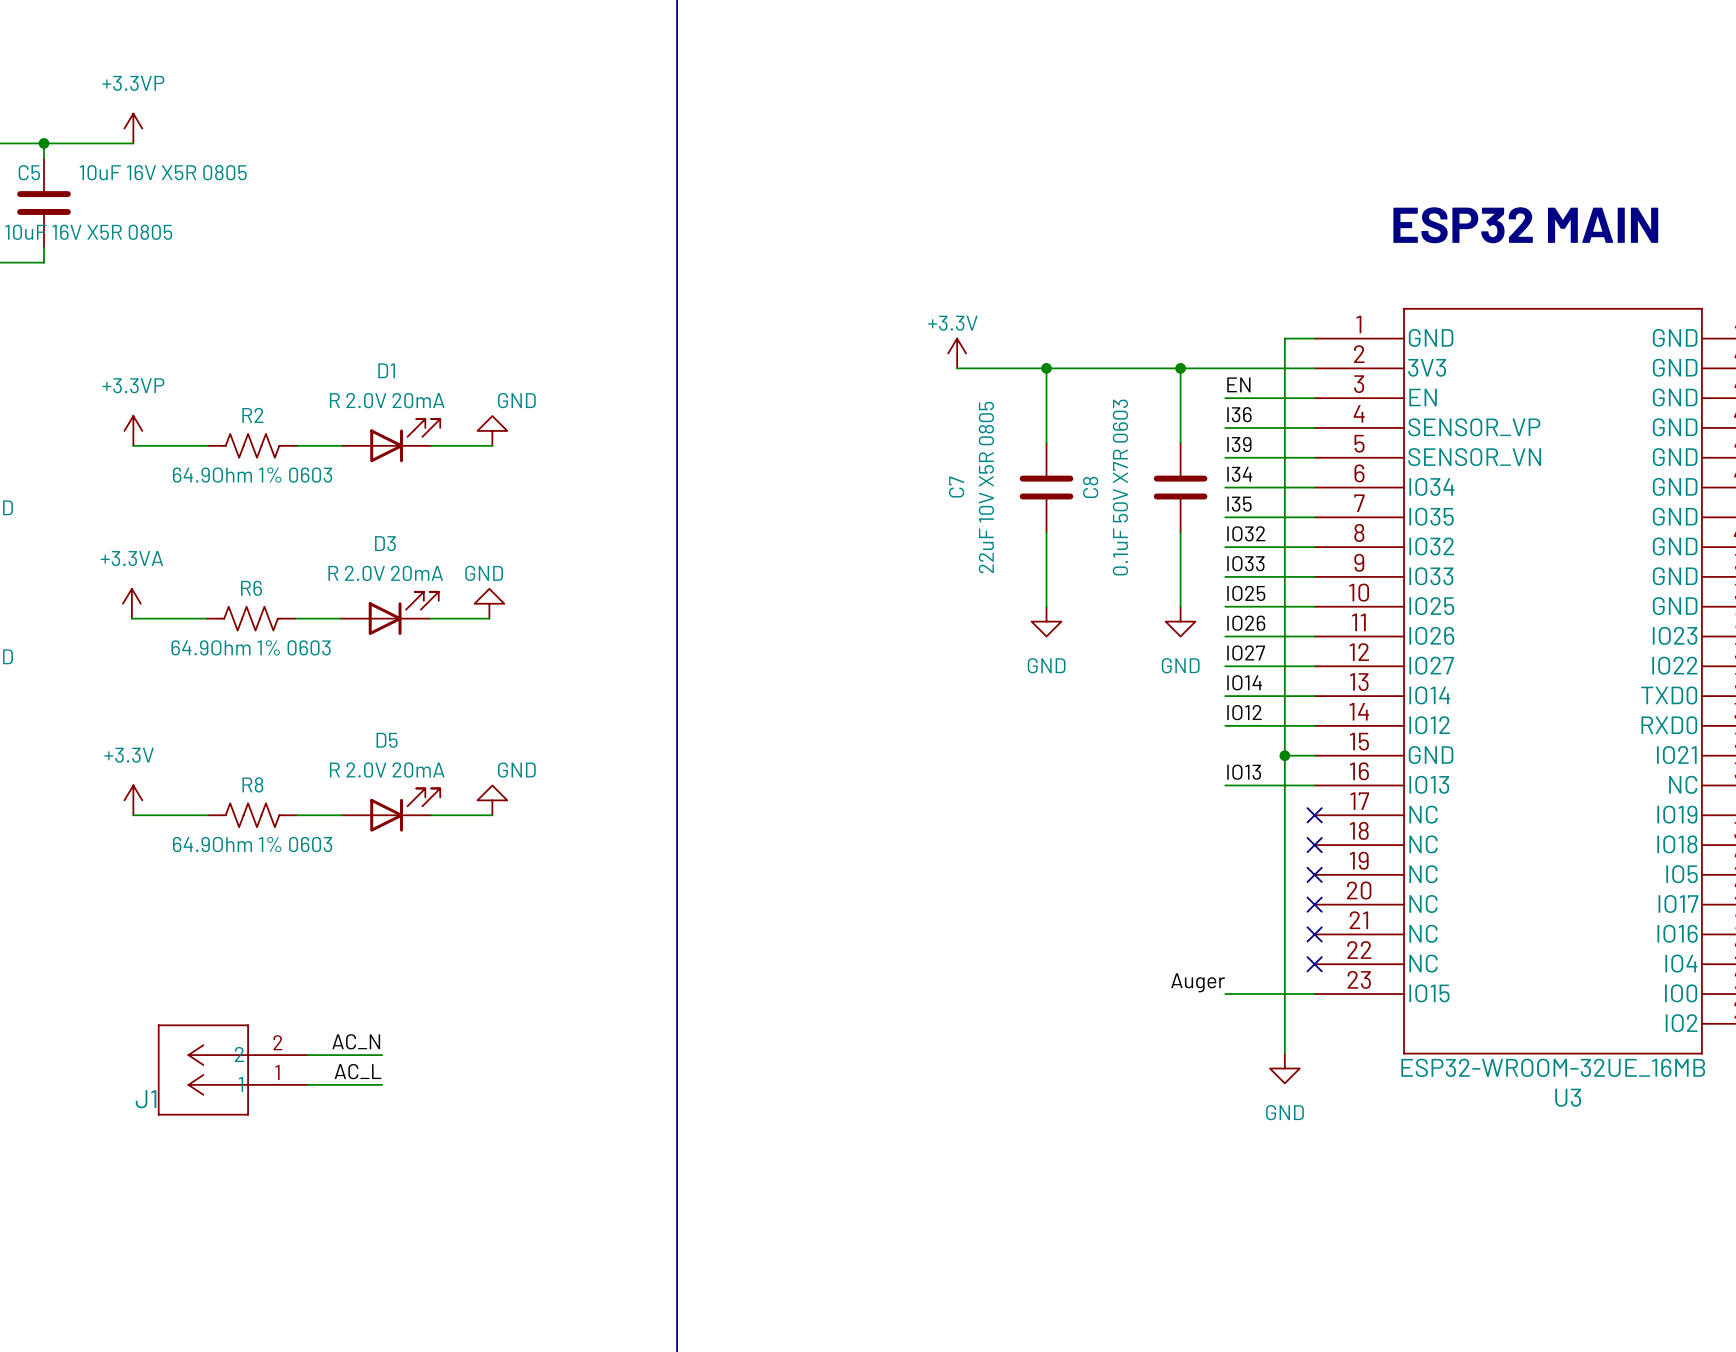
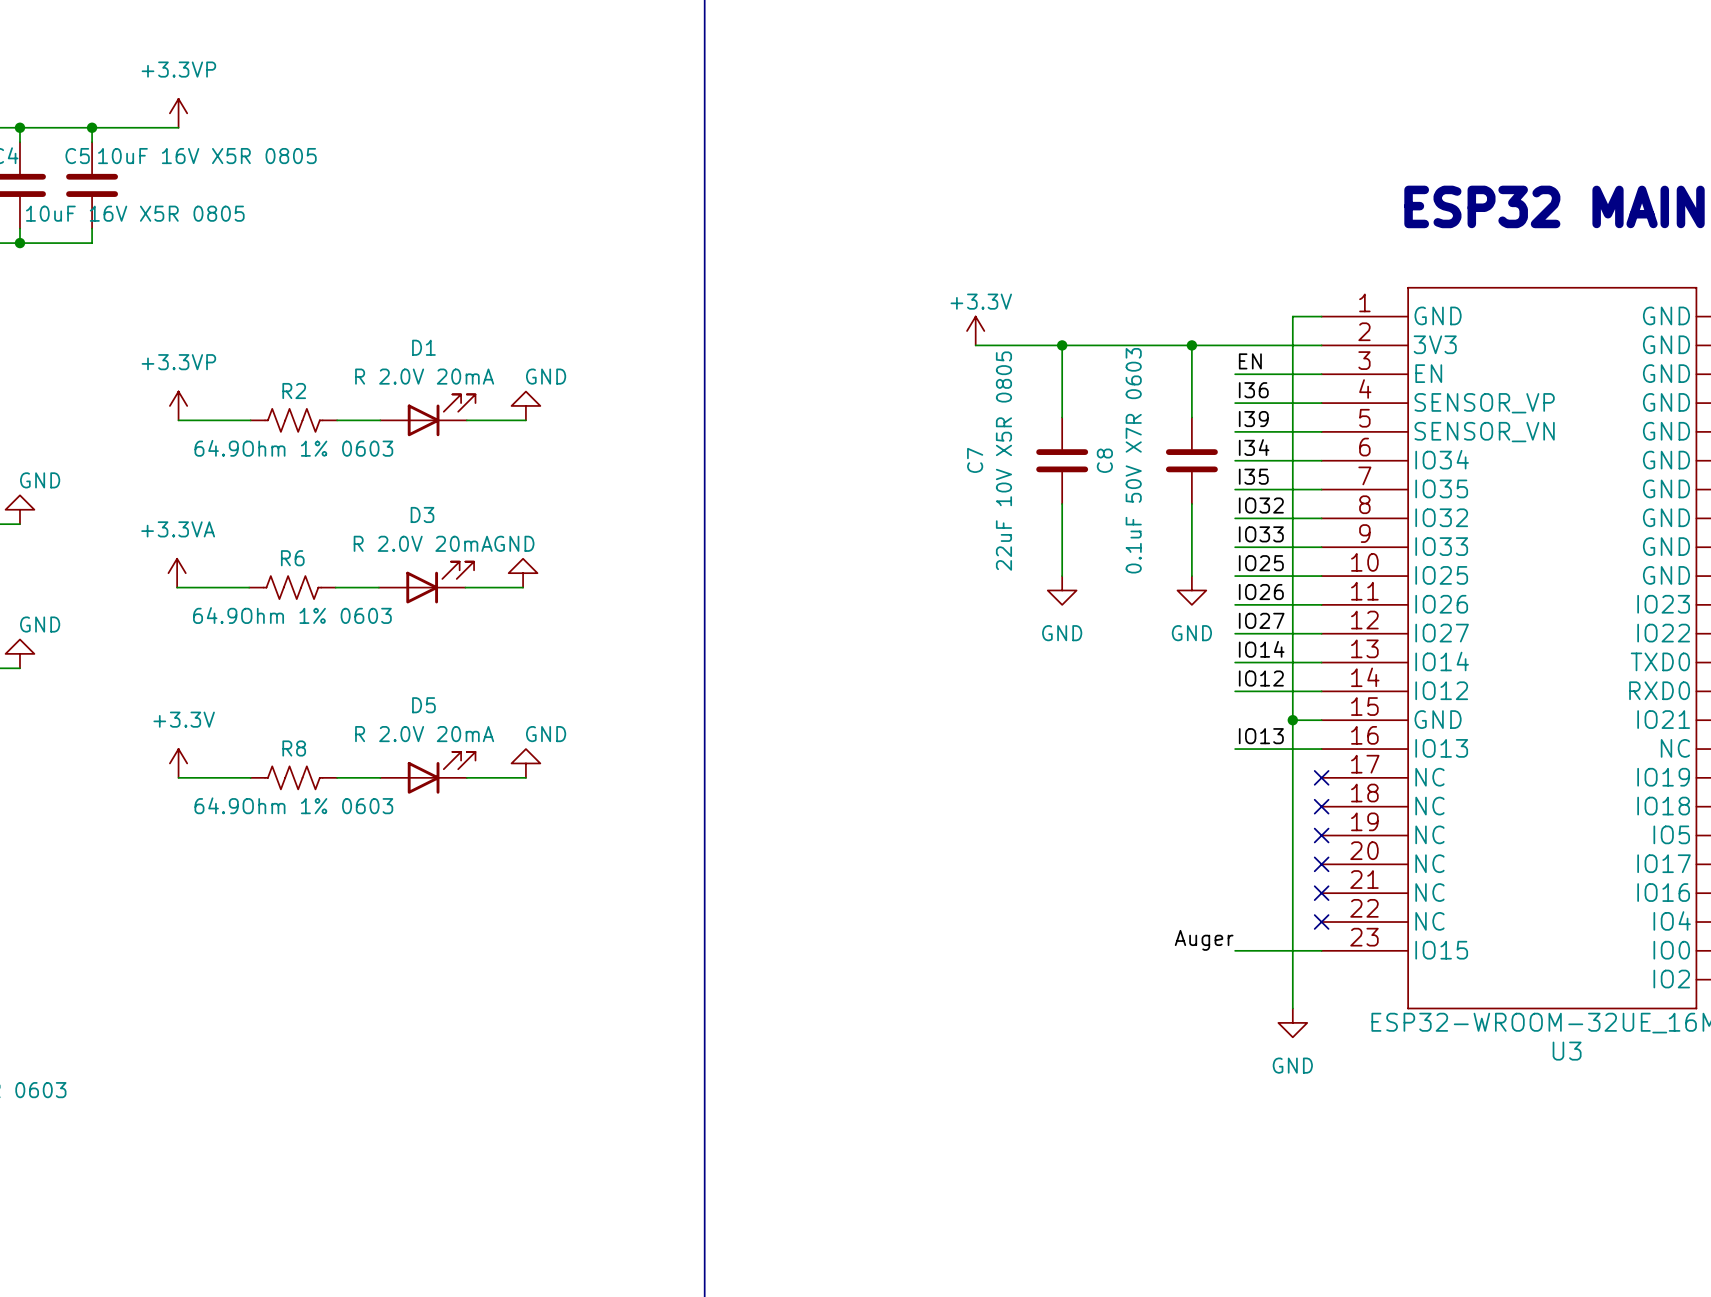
label: AC_N (356, 1041) -> none
wire: (307, 1055) (382, 1055) -> none
J1: (232, 1069) -> none
label: AC_L (357, 1071) -> none
wire: (307, 1084) (382, 1084) -> none

